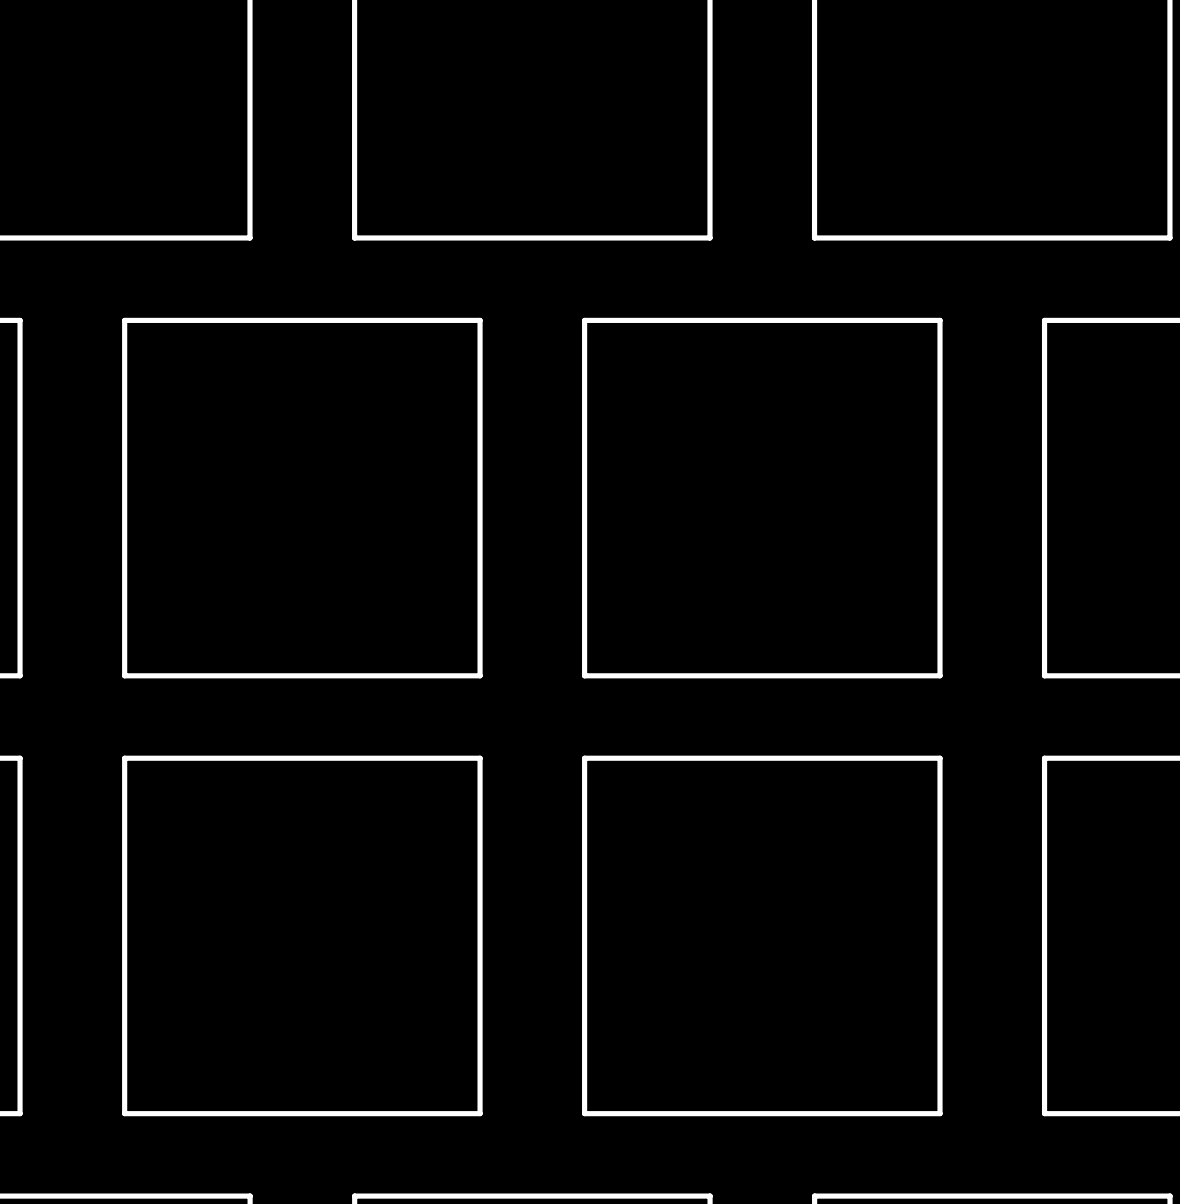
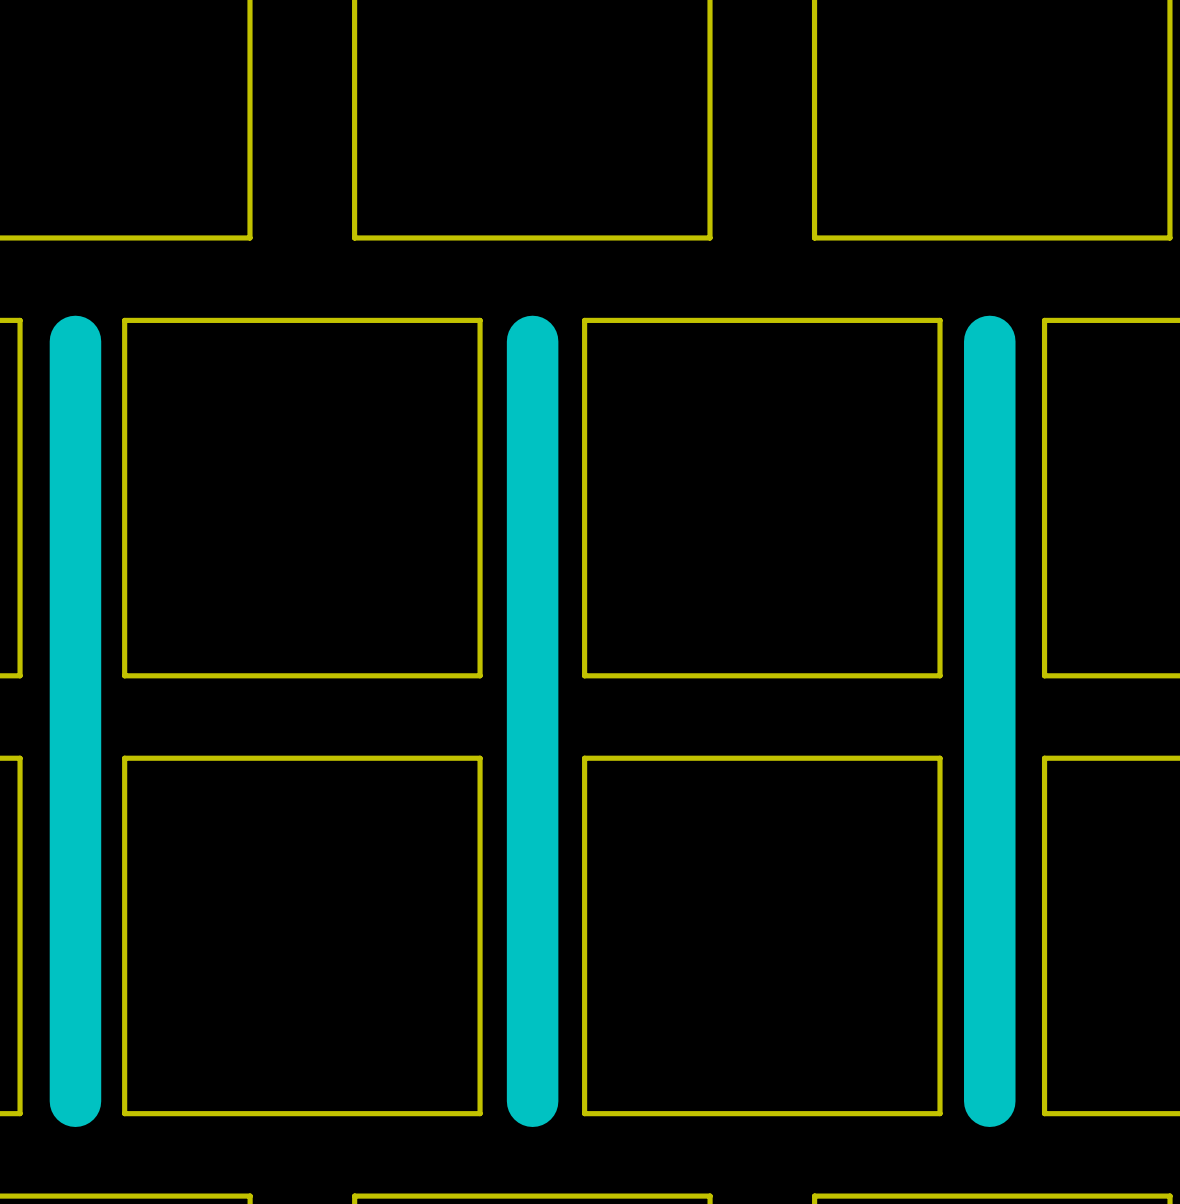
line: none -> (75, 341) (75, 1101)
line: none -> (532, 341) (532, 1101)
line: none -> (989, 341) (989, 1101)

